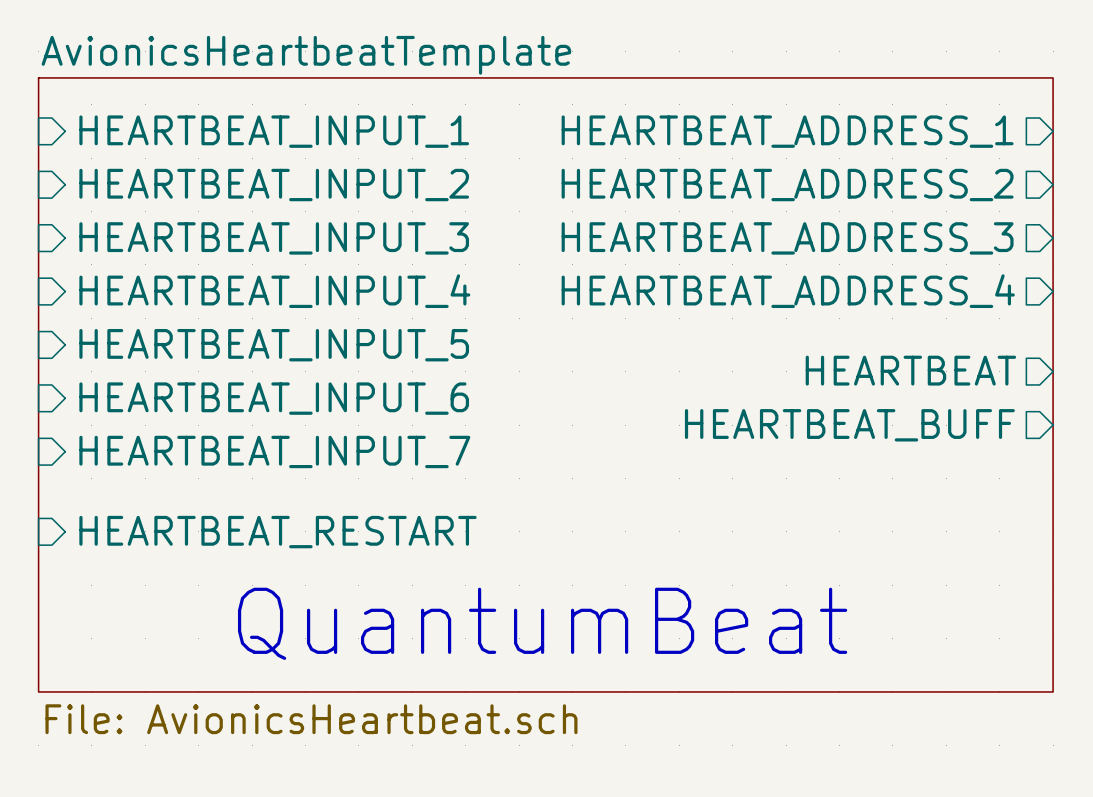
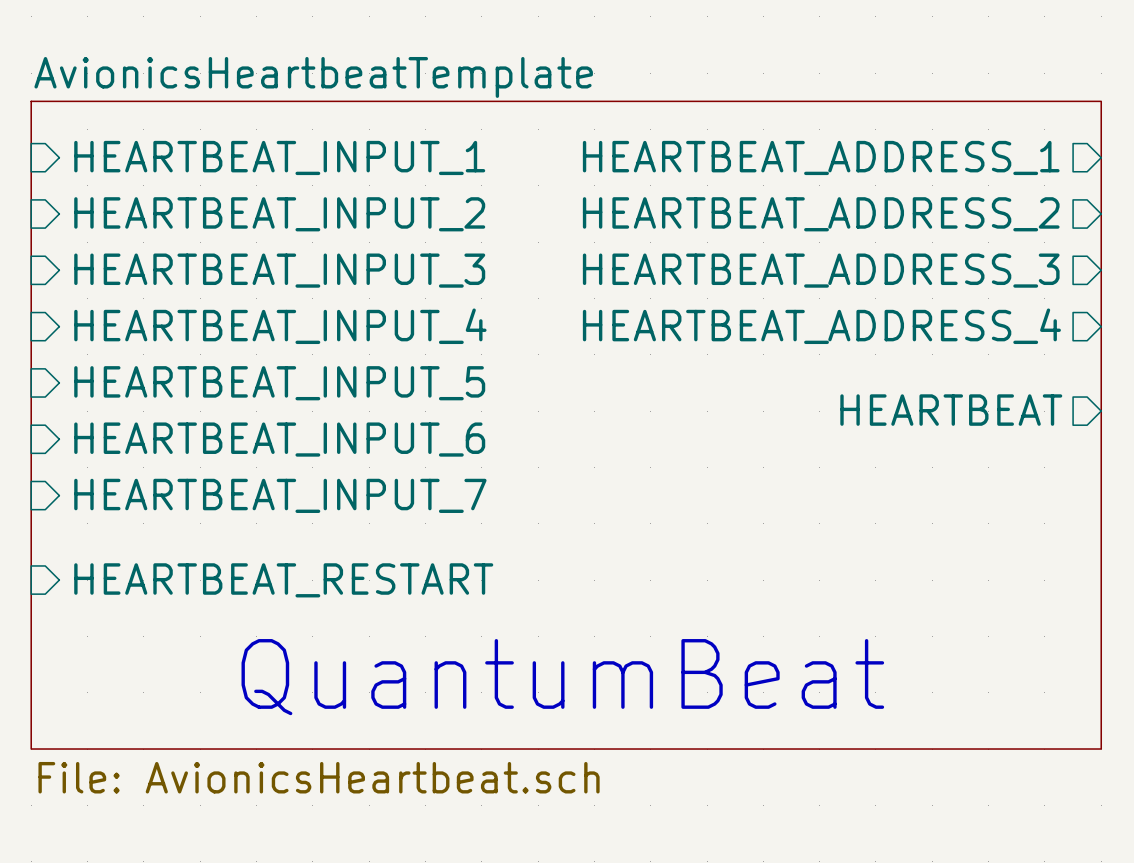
sheet pin: HEARTBEAT_BUFF (849, 425) -> none

